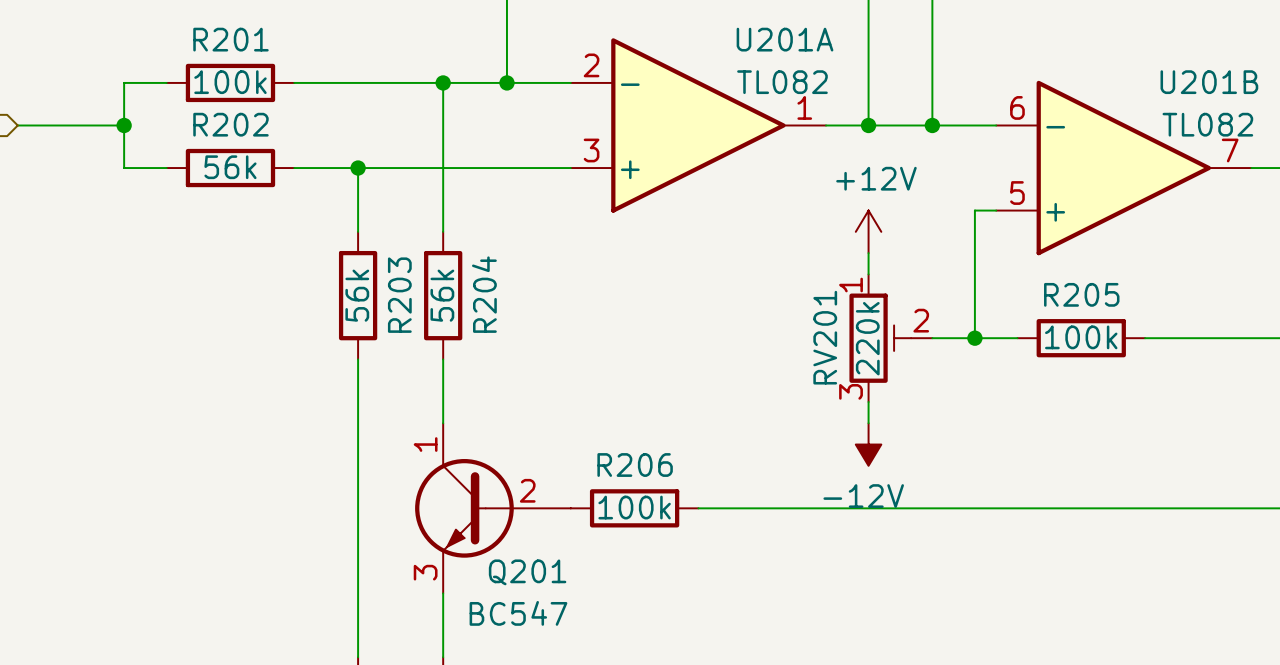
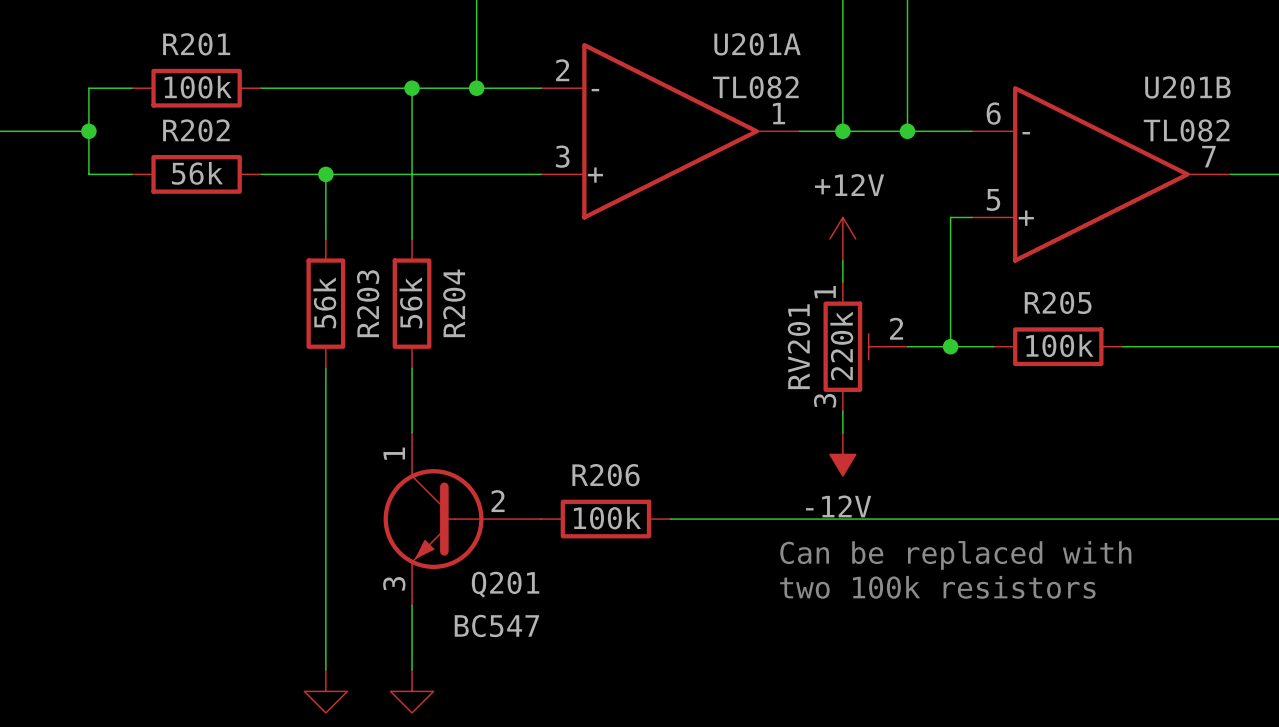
text: none -> Can be replaced with (955, 555)
text: none -> two 100k resistors (937, 587)

